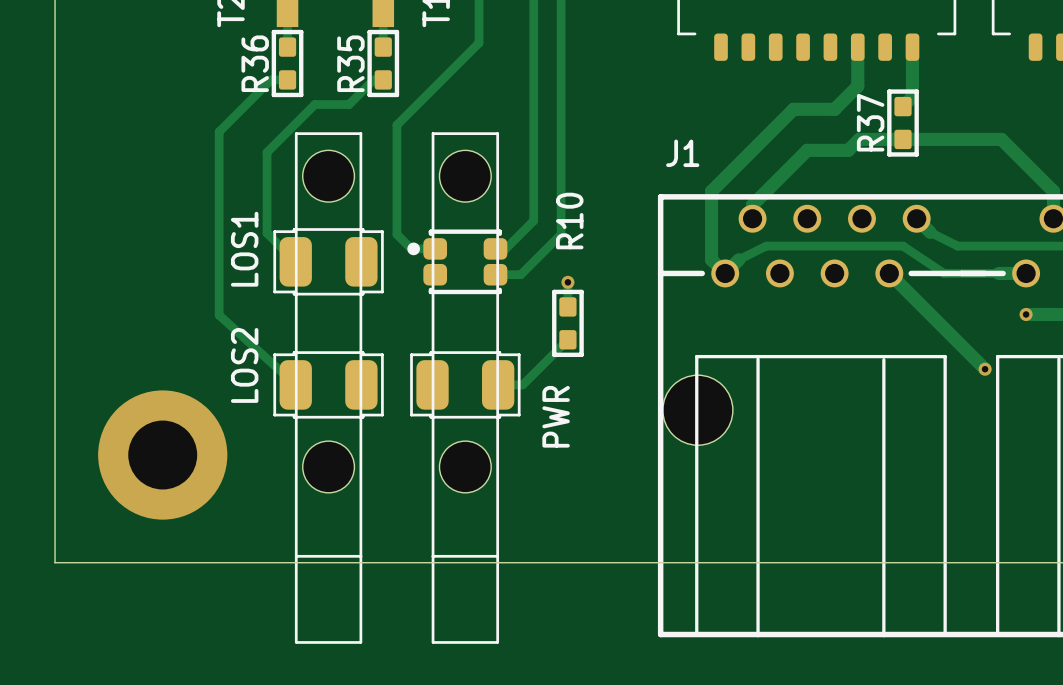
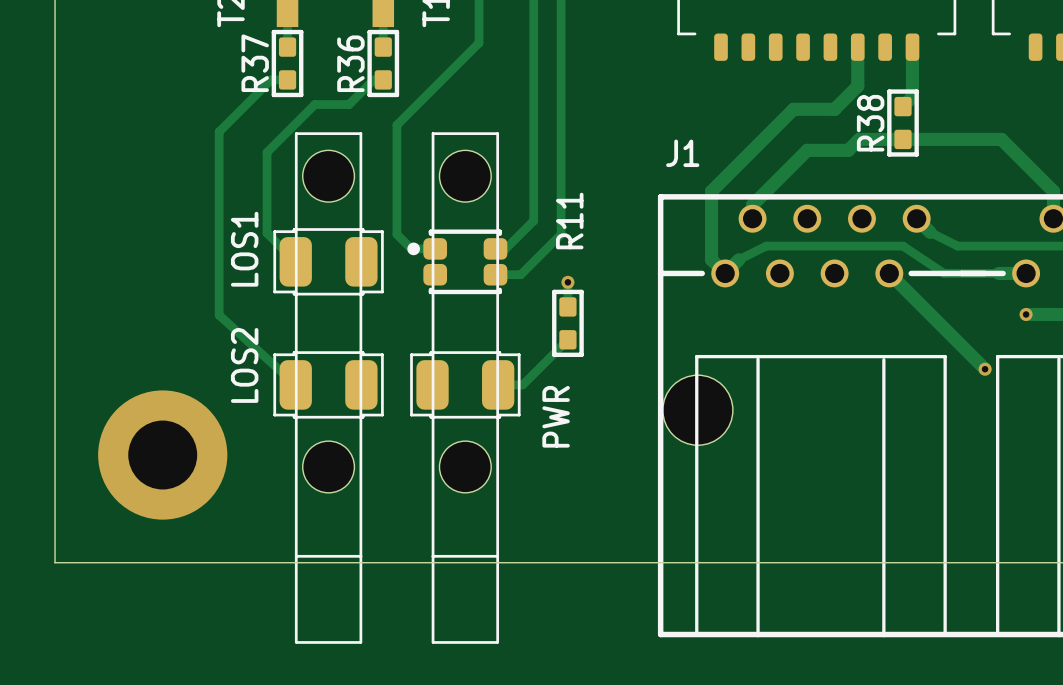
R36 name: R36 (255, 63) -> R37 (255, 63)
R35 name: R35 (350, 63) -> R36 (350, 63)
R37 name: R37 (870, 122) -> R38 (870, 123)
R10 name: R10 (569, 221) -> R11 (569, 221)

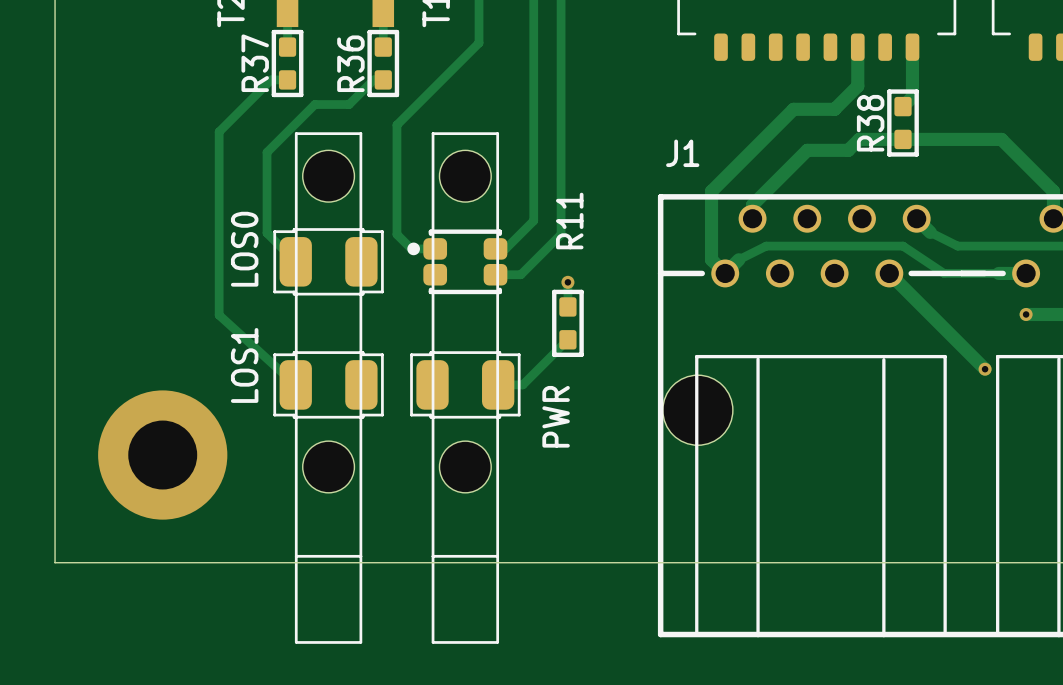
LOS1 name: LOS1 (244, 249) -> LOS0 (244, 249)
LOS2 name: LOS2 (244, 365) -> LOS1 (244, 365)

